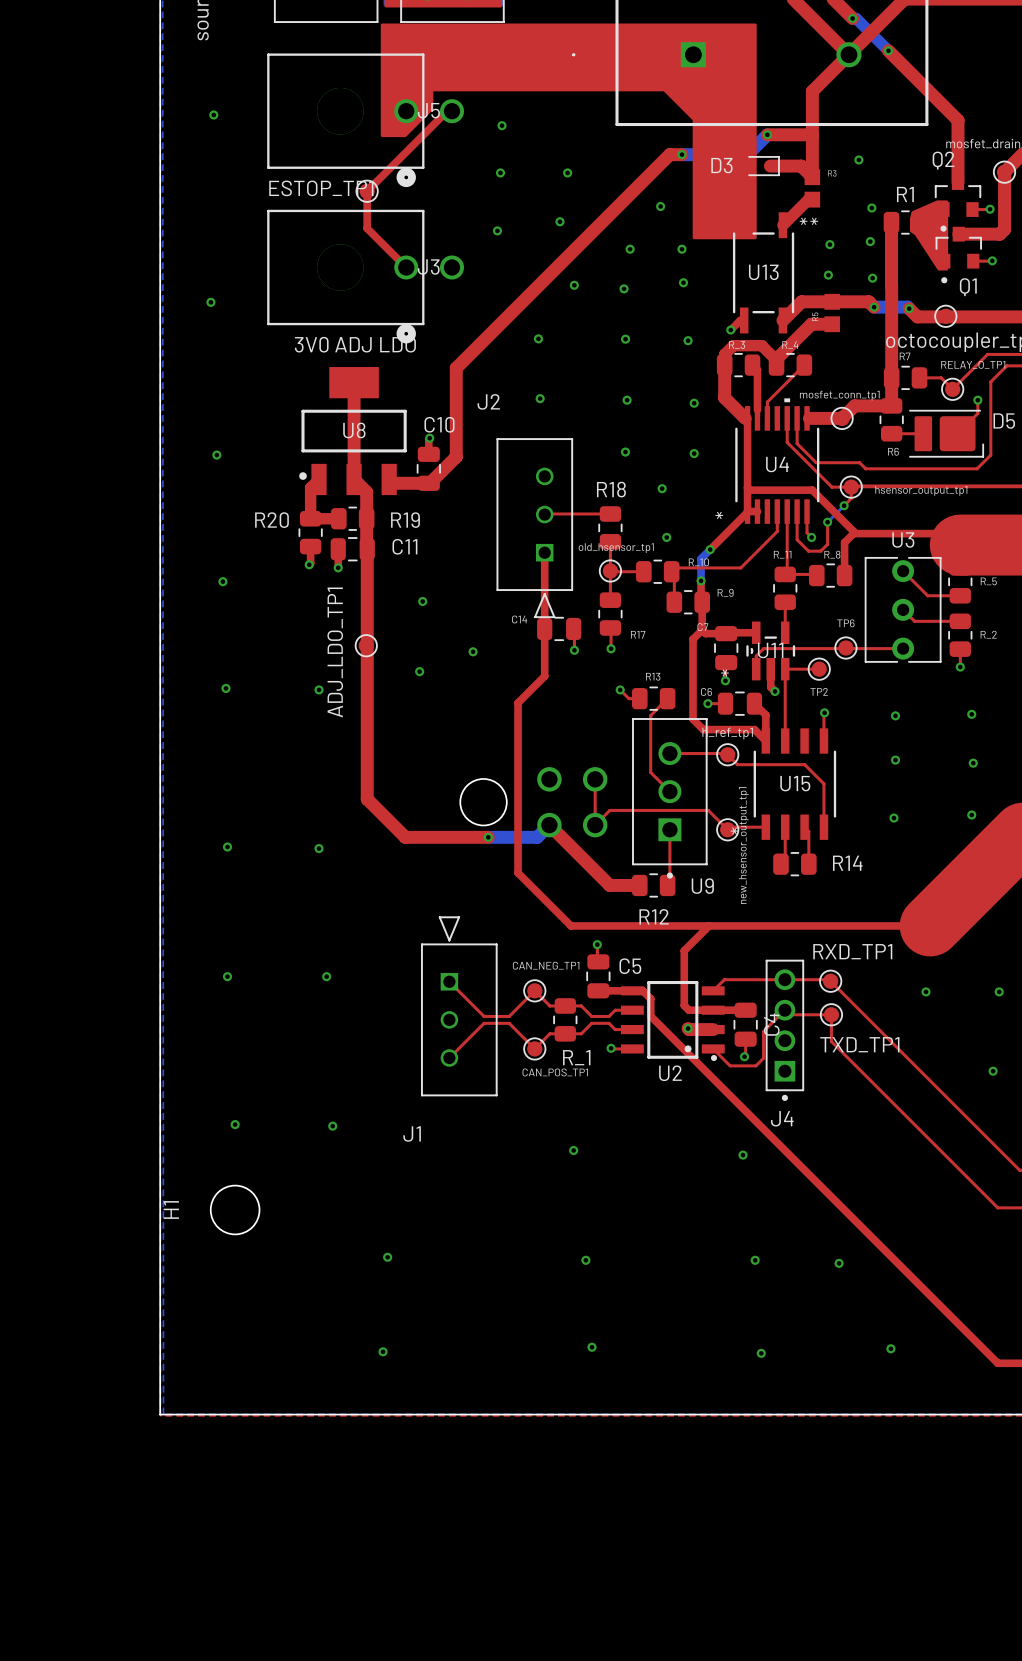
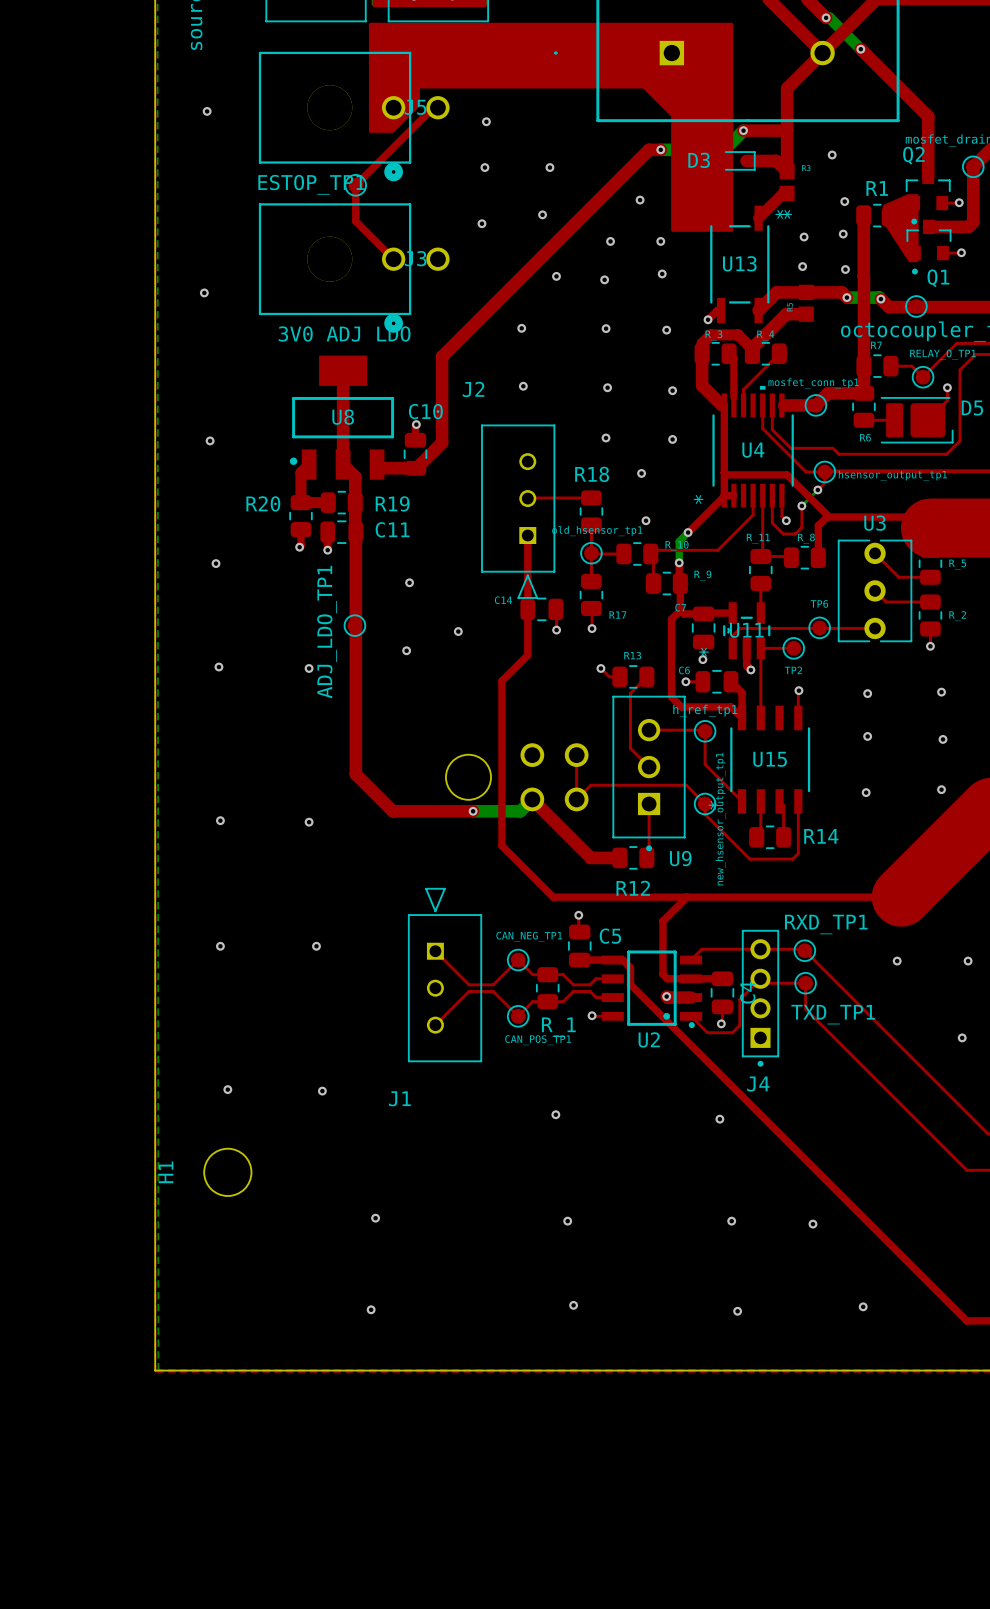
top track: (727, 754) (737, 764) (804, 764) (823, 783) (823, 827) -> (705, 731) (705, 764) (742, 801)
top track: (730, 827) (765, 827) -> none
top track: none -> (798, 801) (798, 853) (792, 859) (749, 859) (705, 814) (705, 803)

